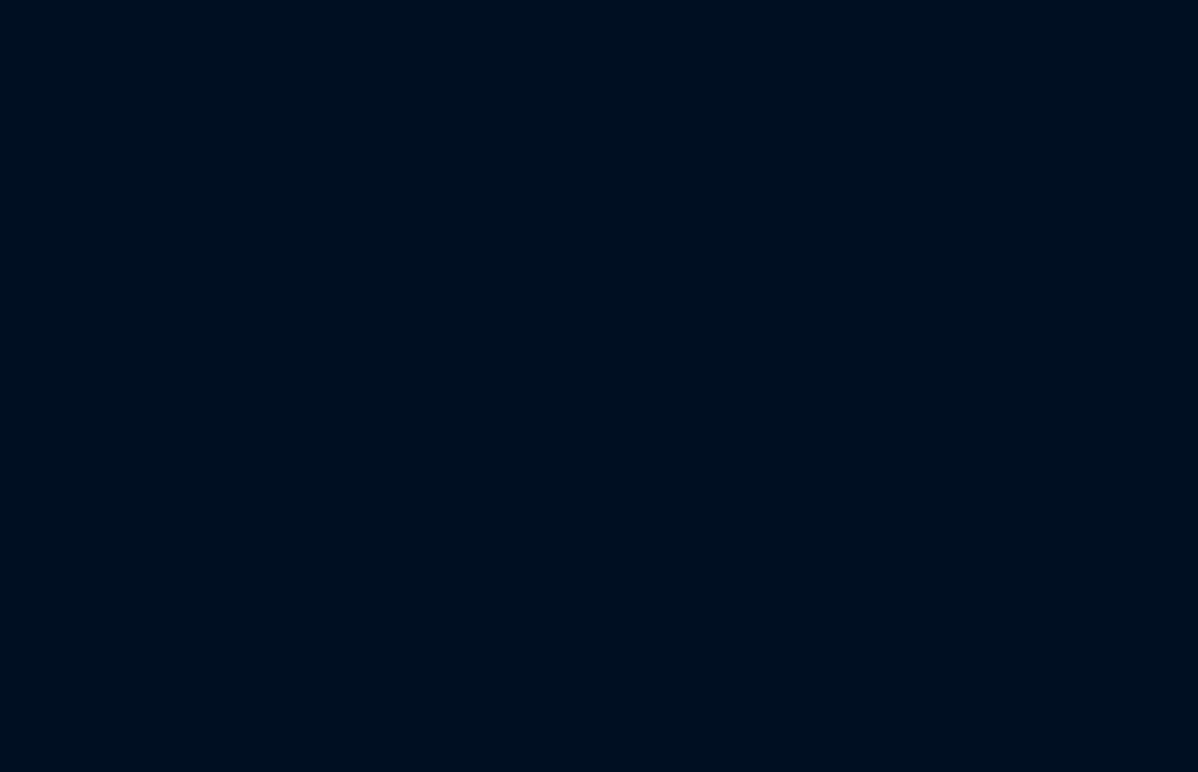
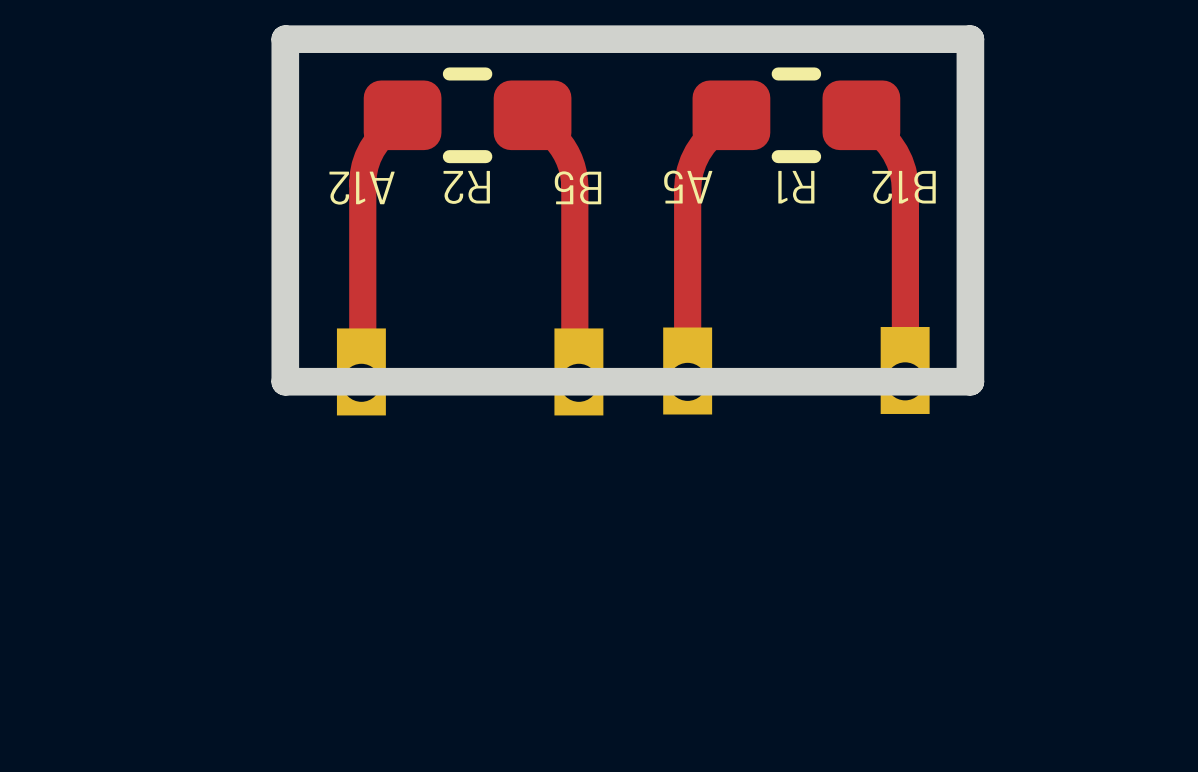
board edge: none -> (285, 39) (970, 39) (970, 381) (285, 381) (285, 39)
track: none -> (402, 115) (371, 149) (363, 174) (362, 352) (364, 354)
R2: none -> (467, 115)
track: none -> (532, 115) (562, 147) (573, 173) (574, 354)
track: none -> (731, 115) (709, 137) (697, 152) (688, 180) (687, 354)
R1: none -> (796, 115)
track: none -> (861, 115) (883, 137) (895, 152) (904, 180) (905, 354)
part: none -> B12 (905, 370)
part: none -> A12 (361, 371)
part: none -> B5 (578, 371)
part: none -> A5 (687, 371)

